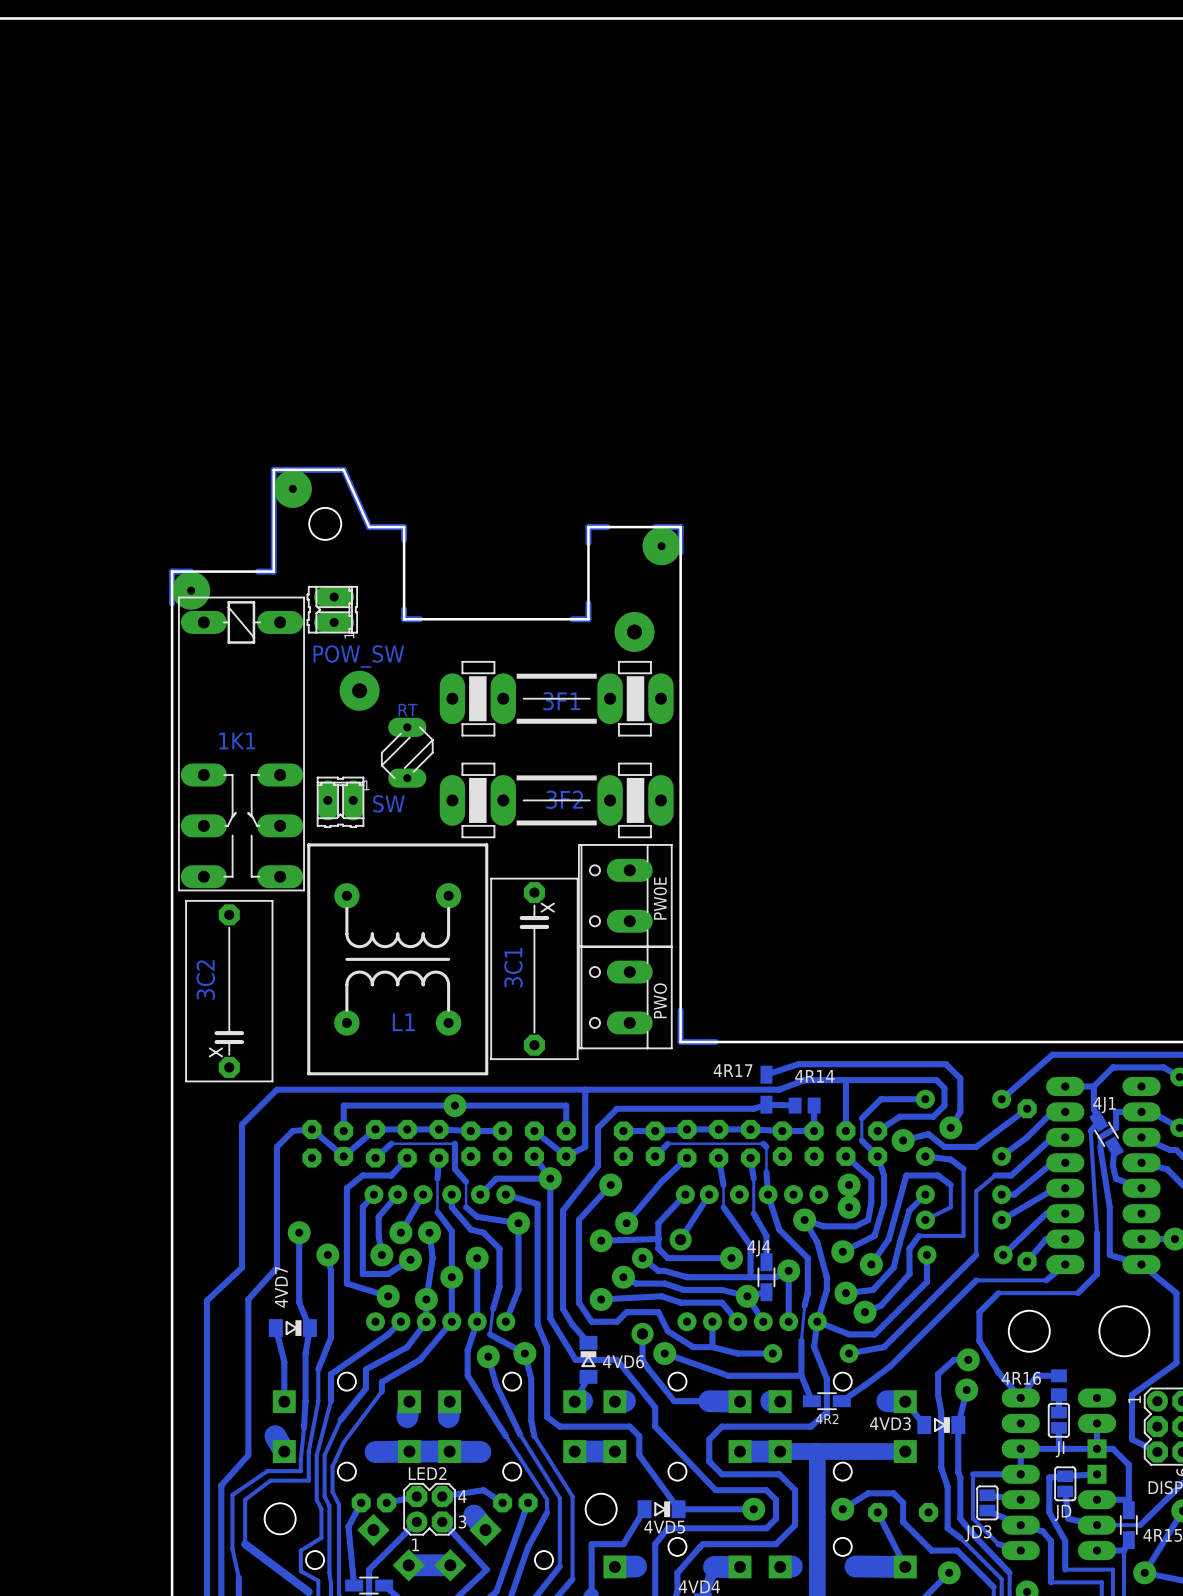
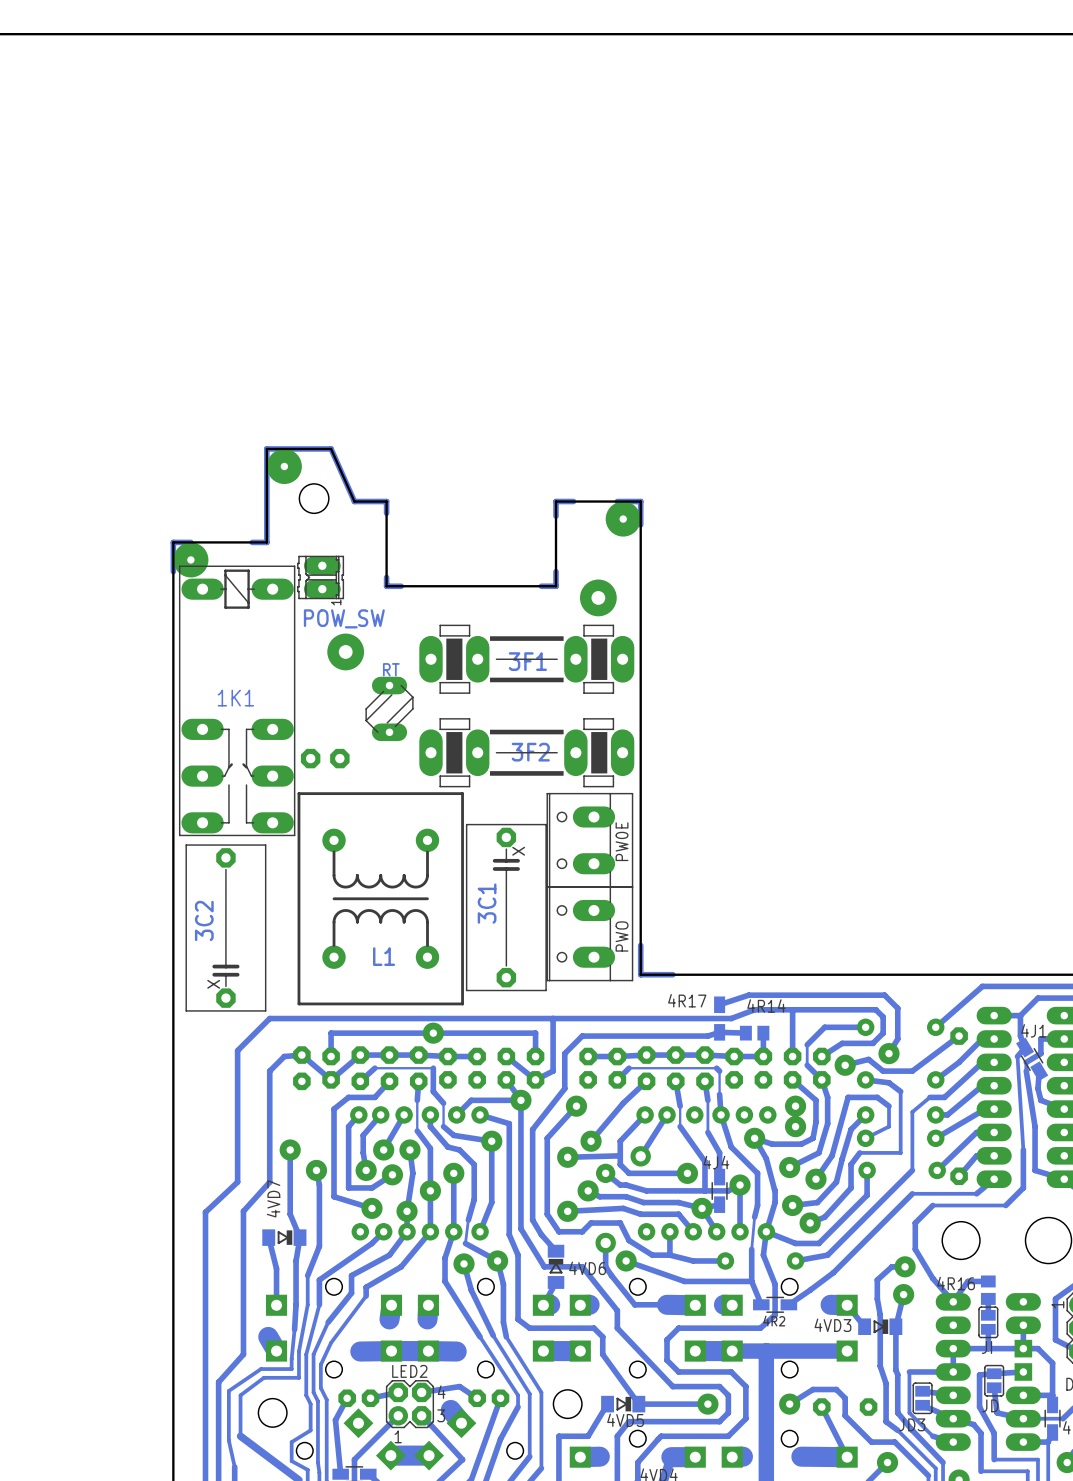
SW: (340, 802) -> none
part: none -> (310, 758)
part: none -> (339, 758)

